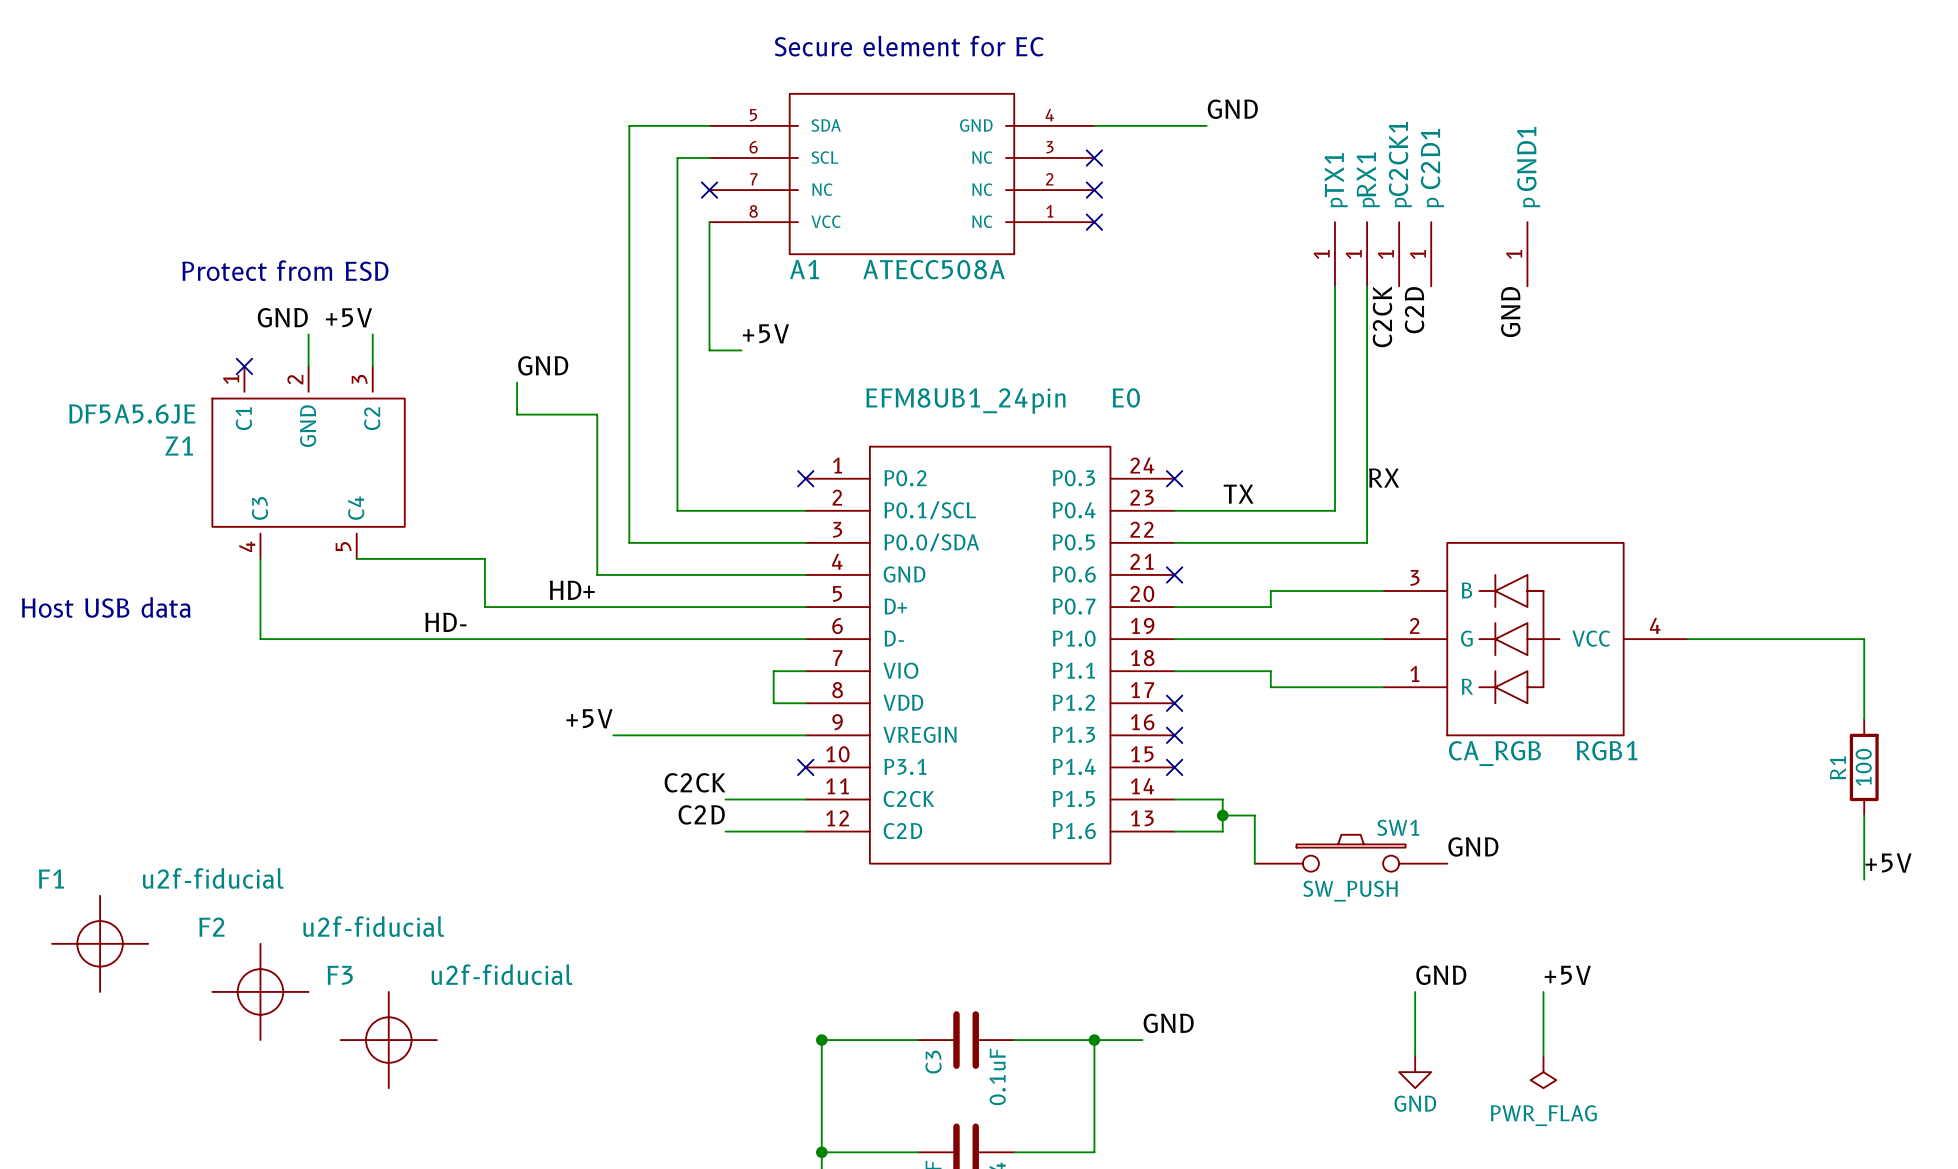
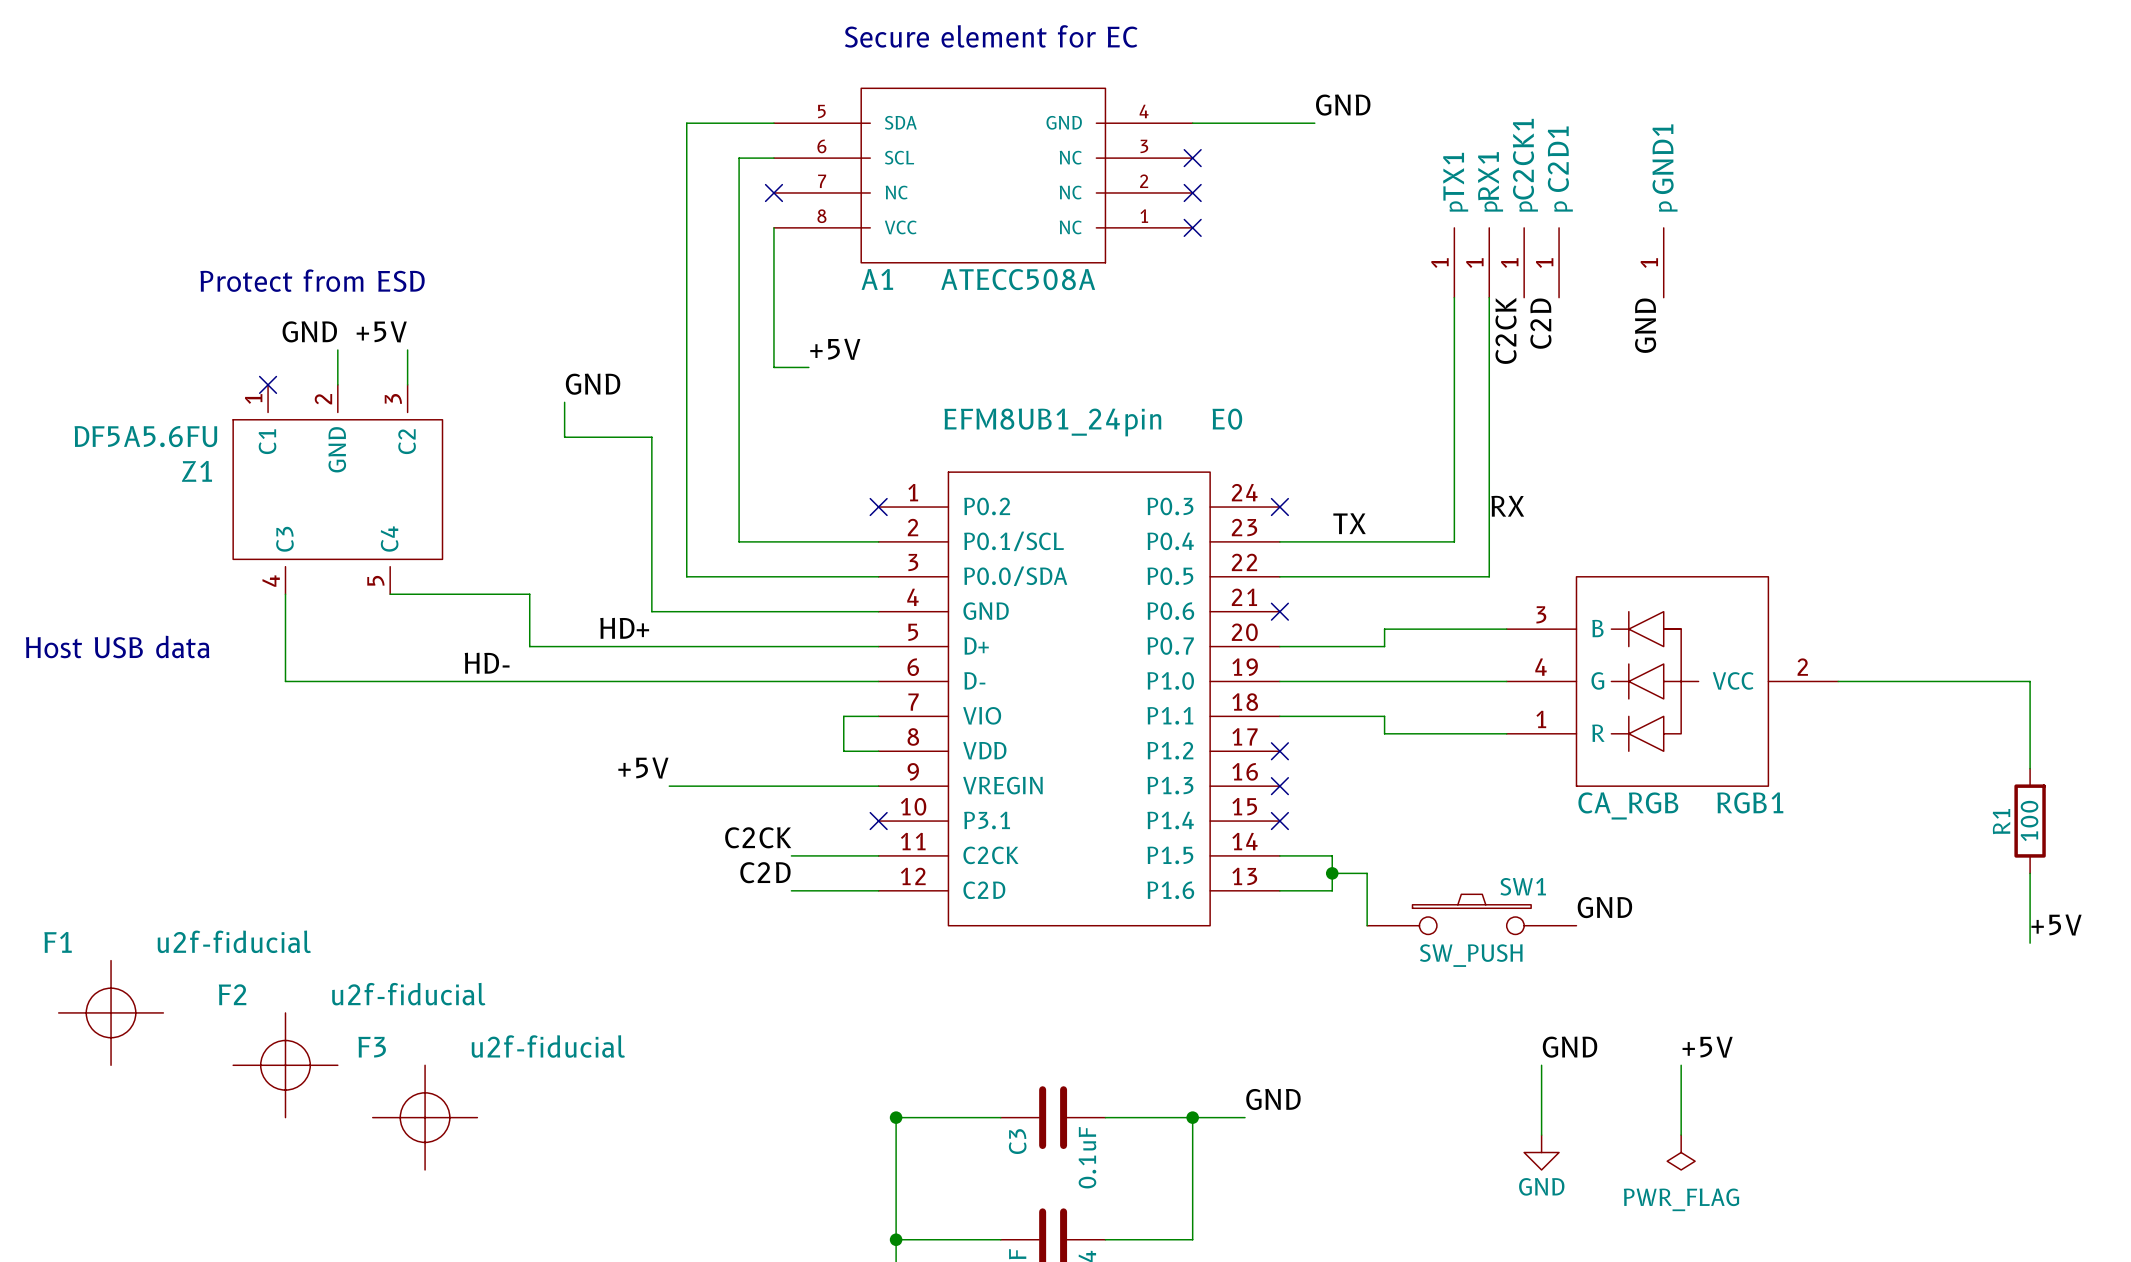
Z1 value: DF5A5.6JE (132, 413) -> DF5A5.6FU (145, 436)
RGB1 pin number: 2 (1414, 625) -> 4 (1541, 667)
RGB1 pin number: 4 (1655, 625) -> 2 (1802, 667)

